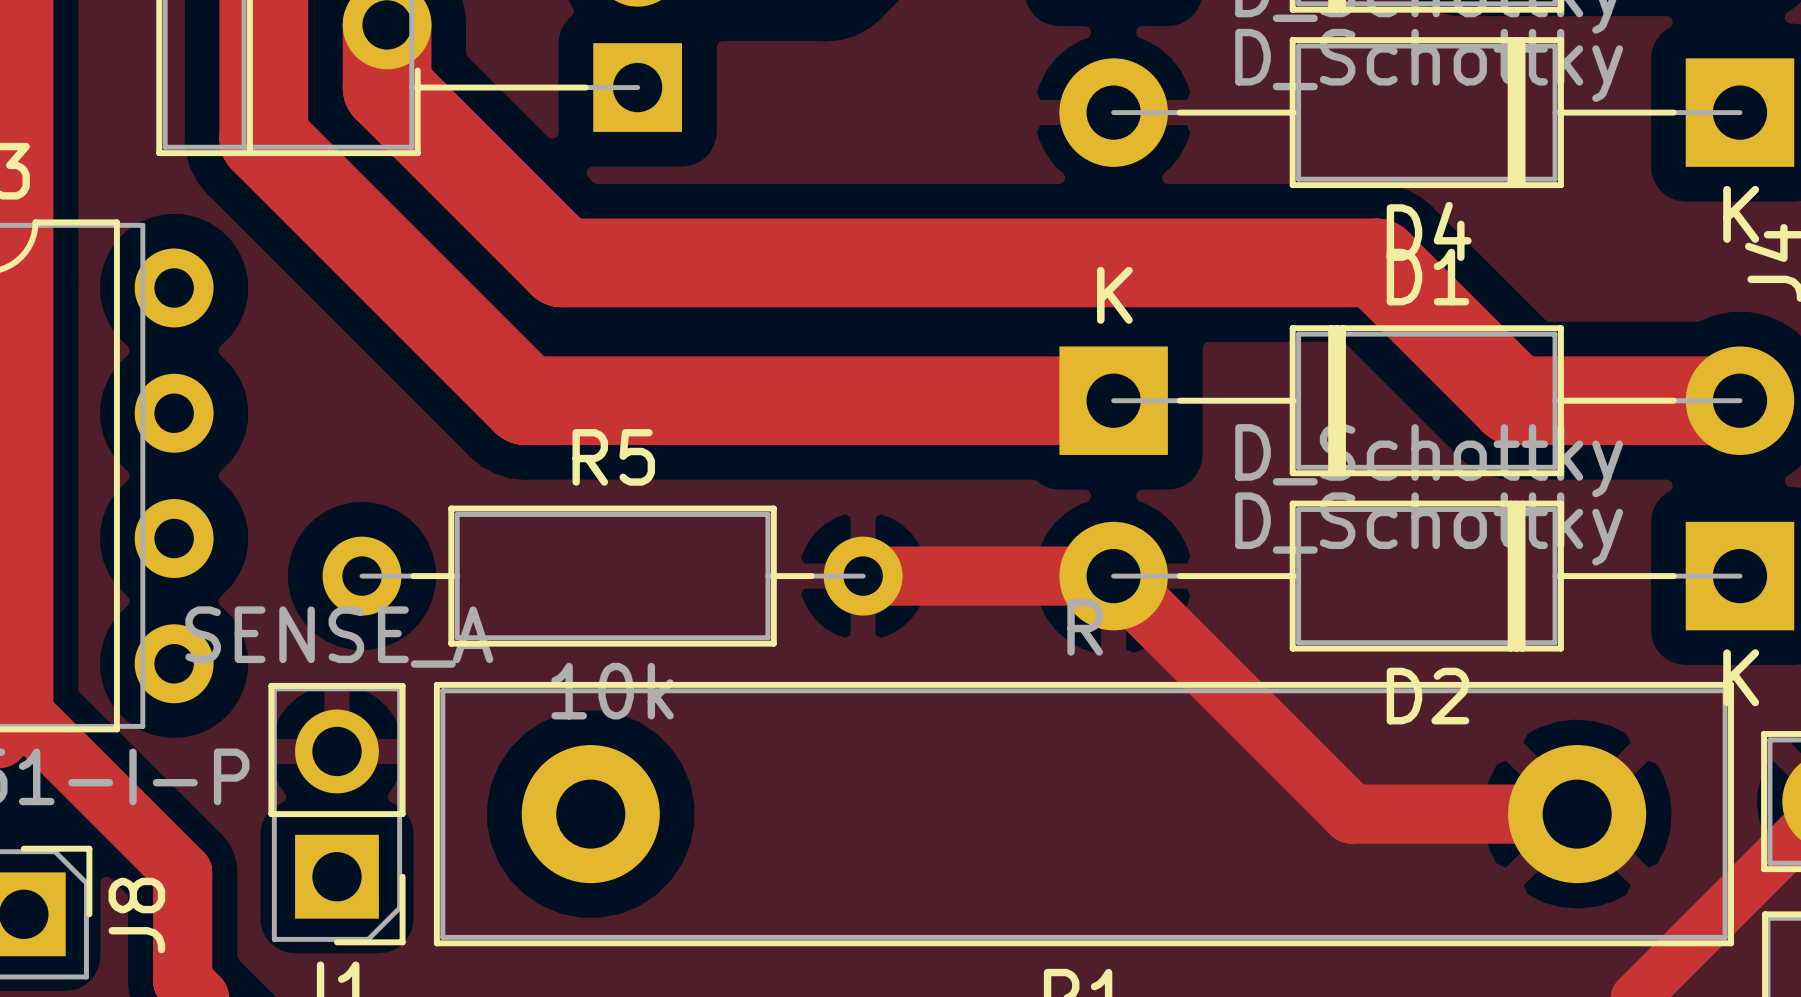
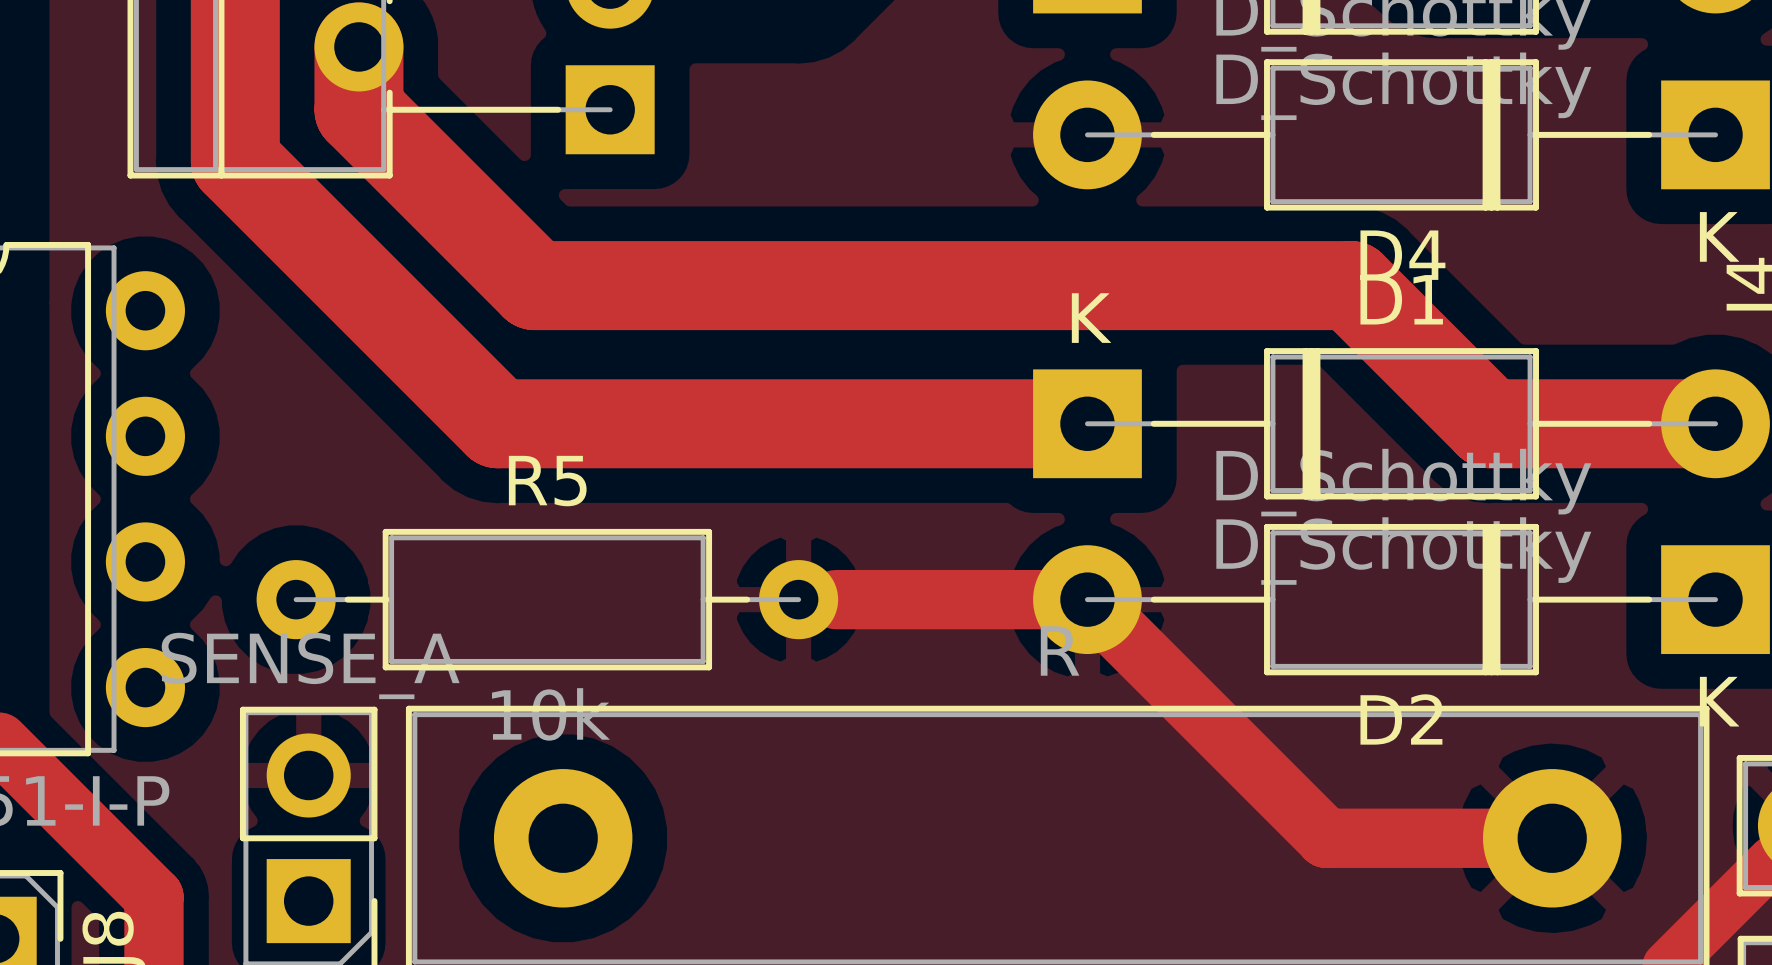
R5 position: (612, 576) -> (547, 599)

